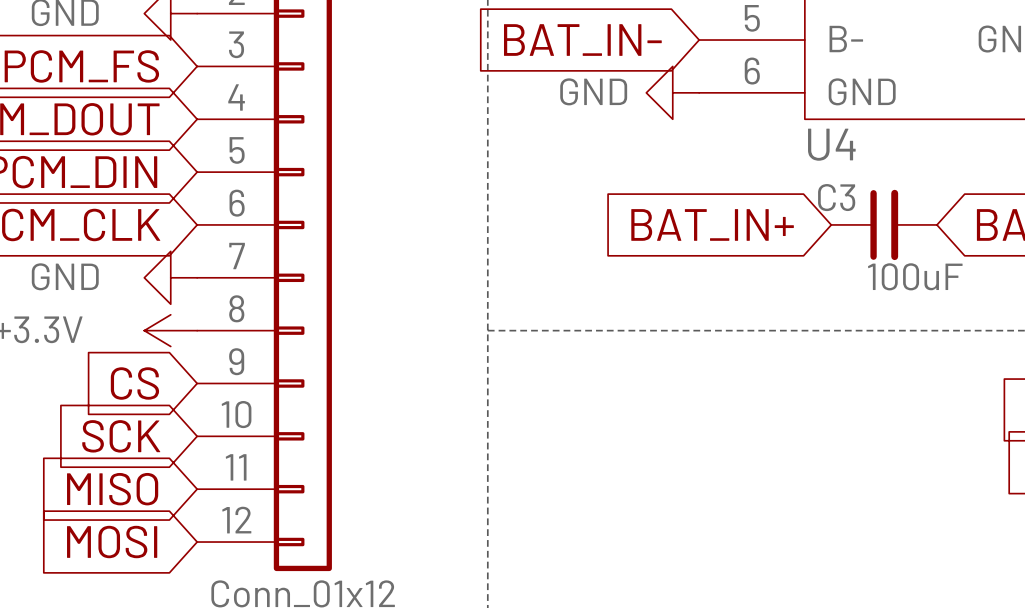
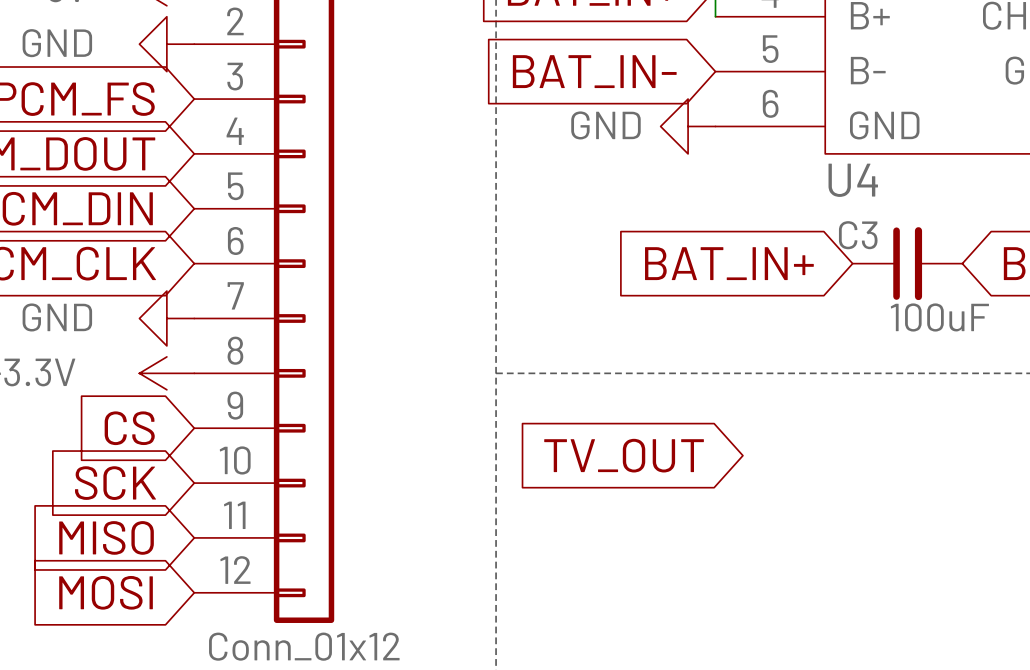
global label: none -> TV_OUT (624, 455)

